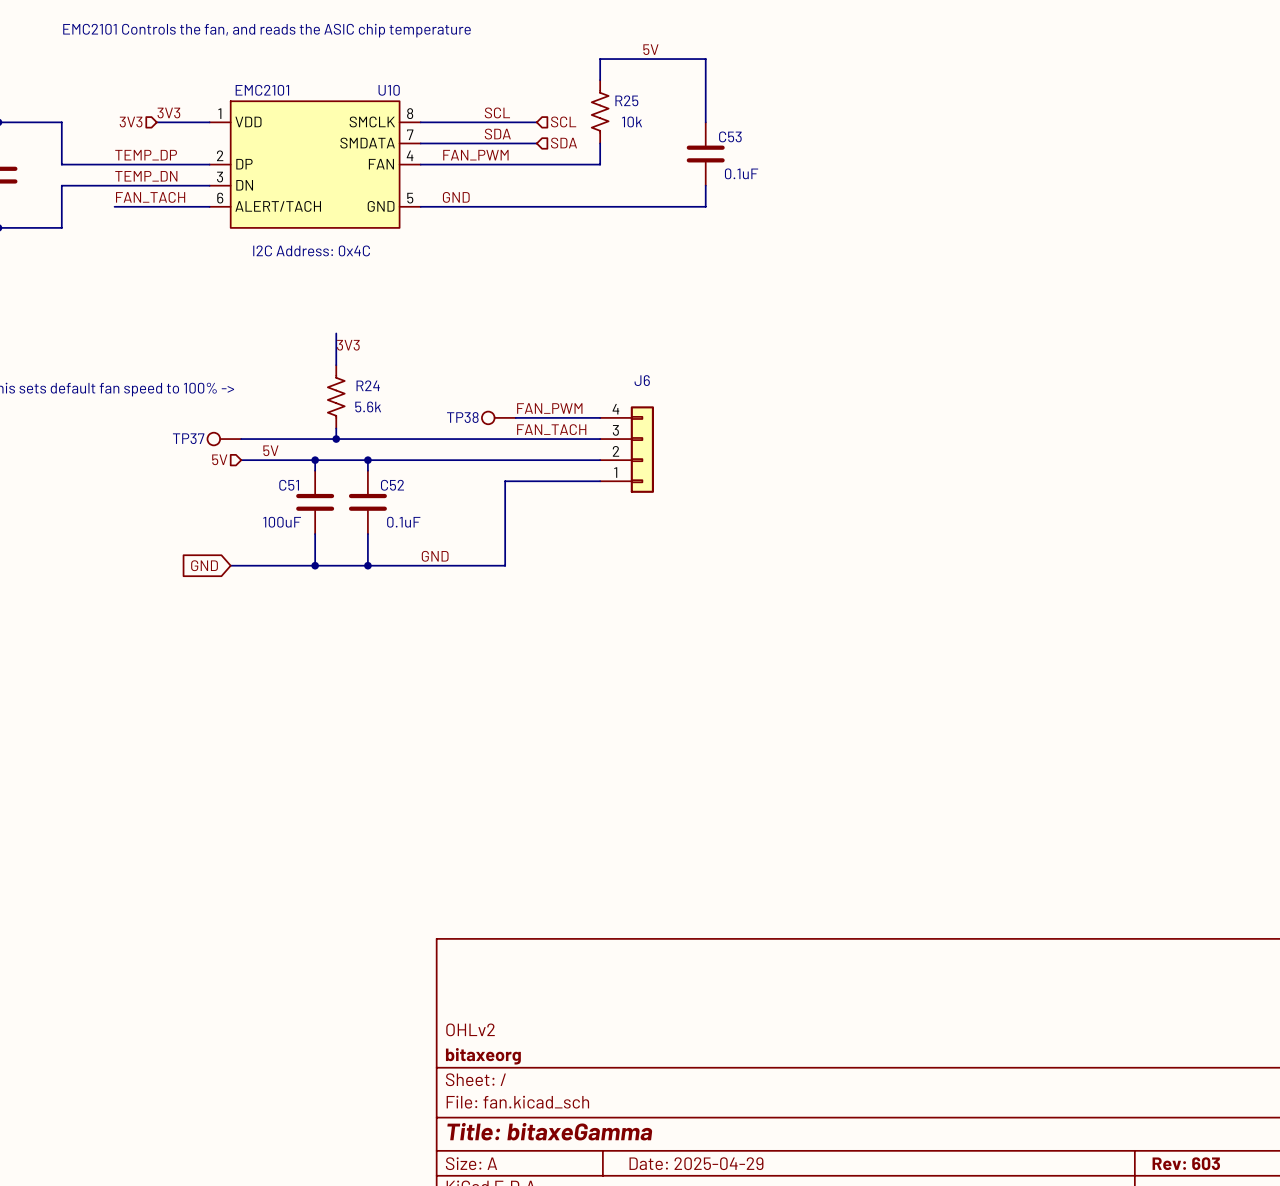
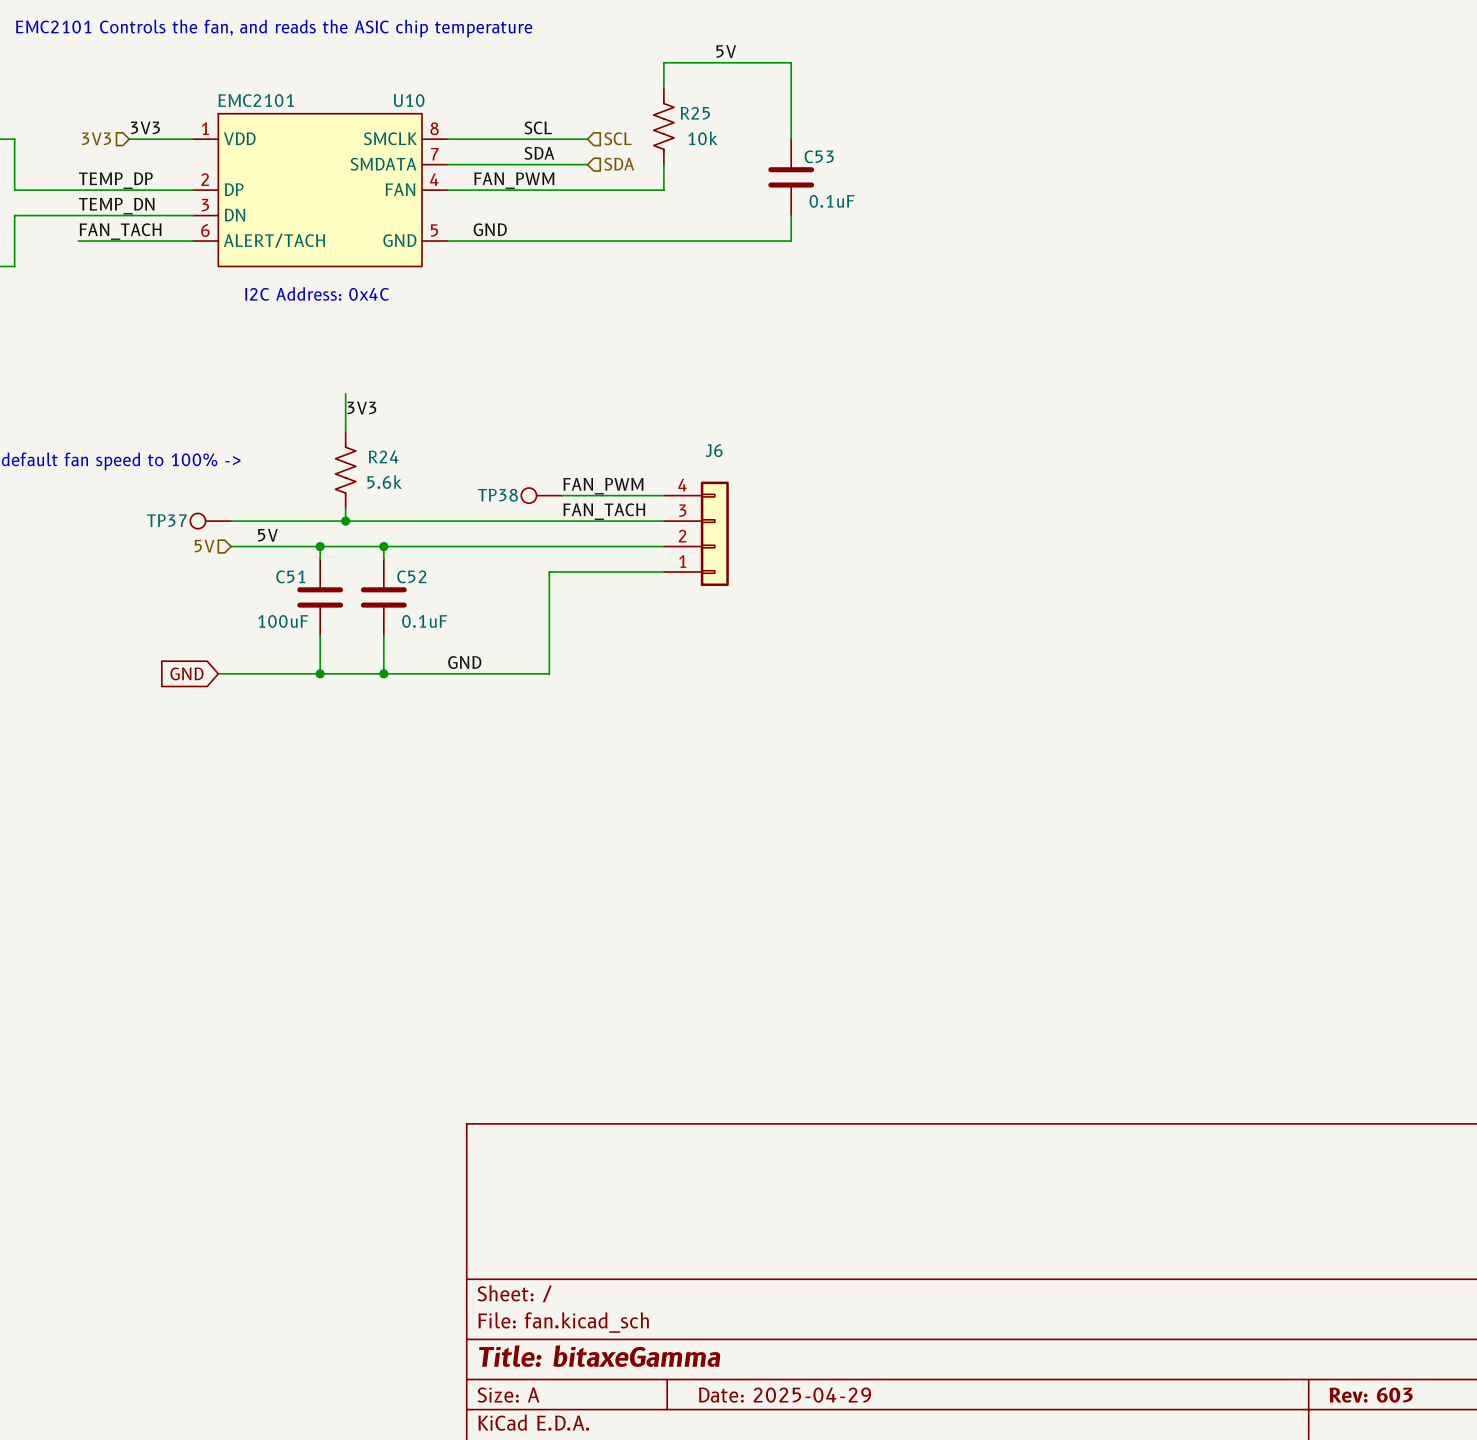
title block: OHLv2 (470, 1029) -> none
title block: bitaxeorg (483, 1056) -> none

